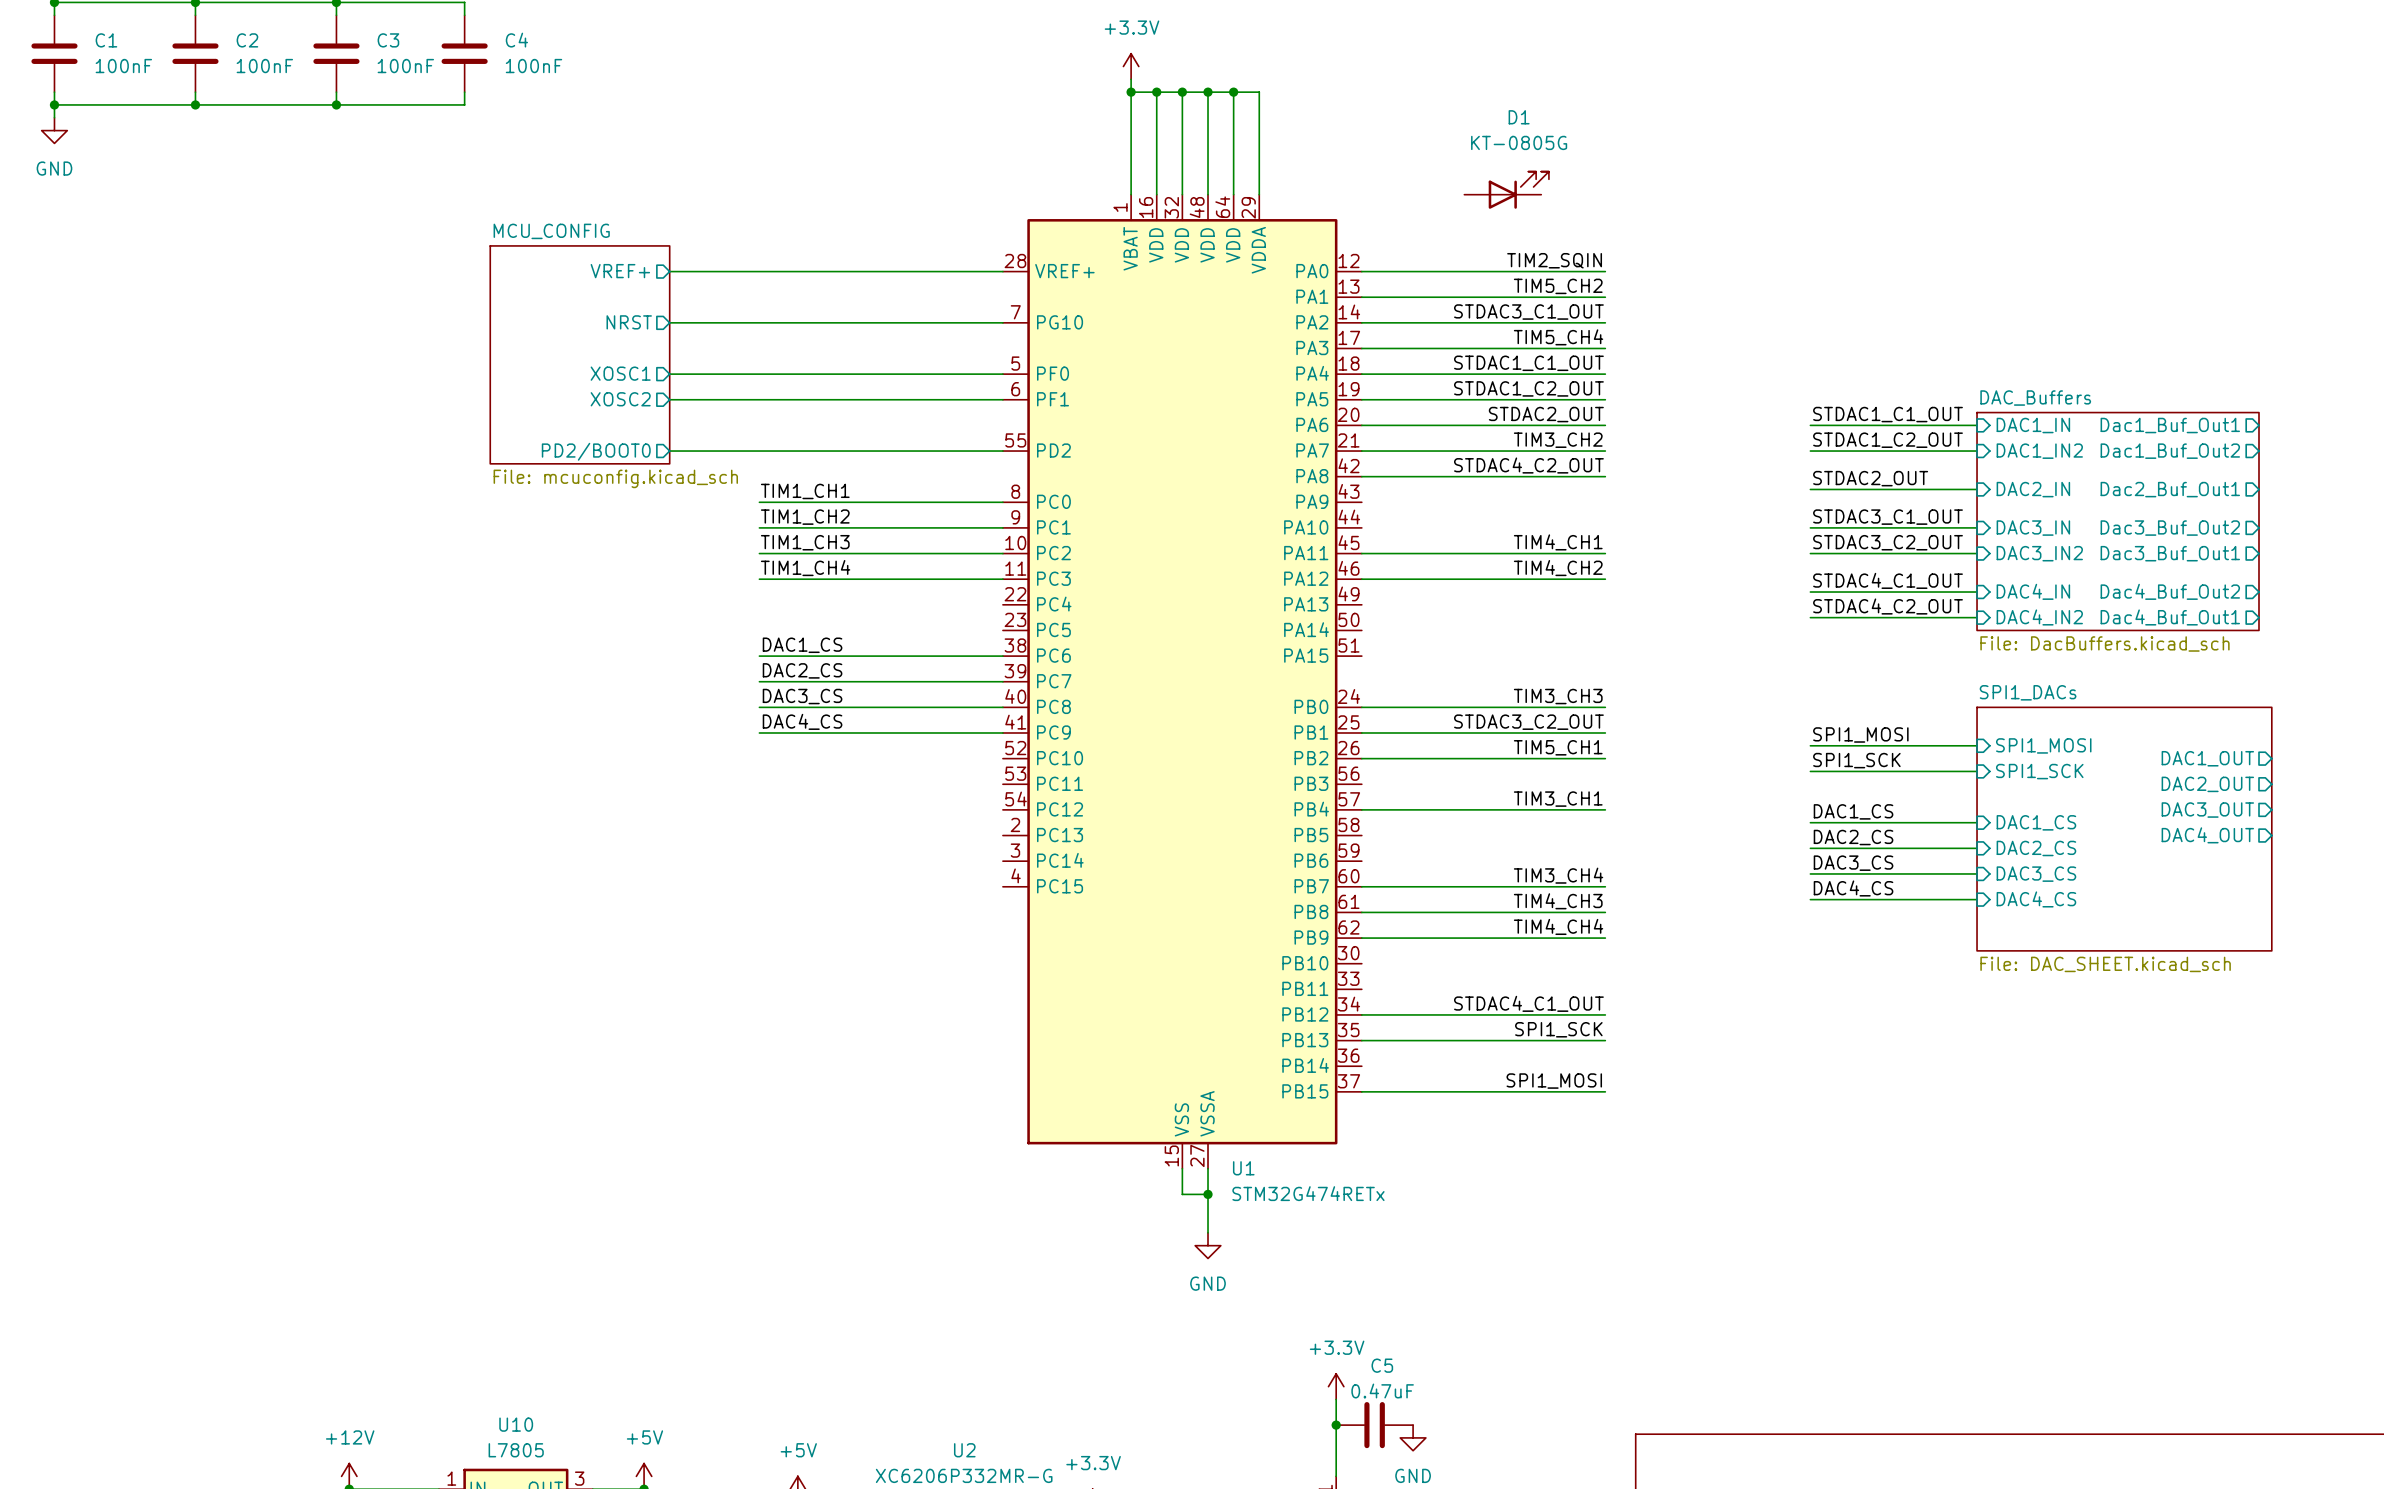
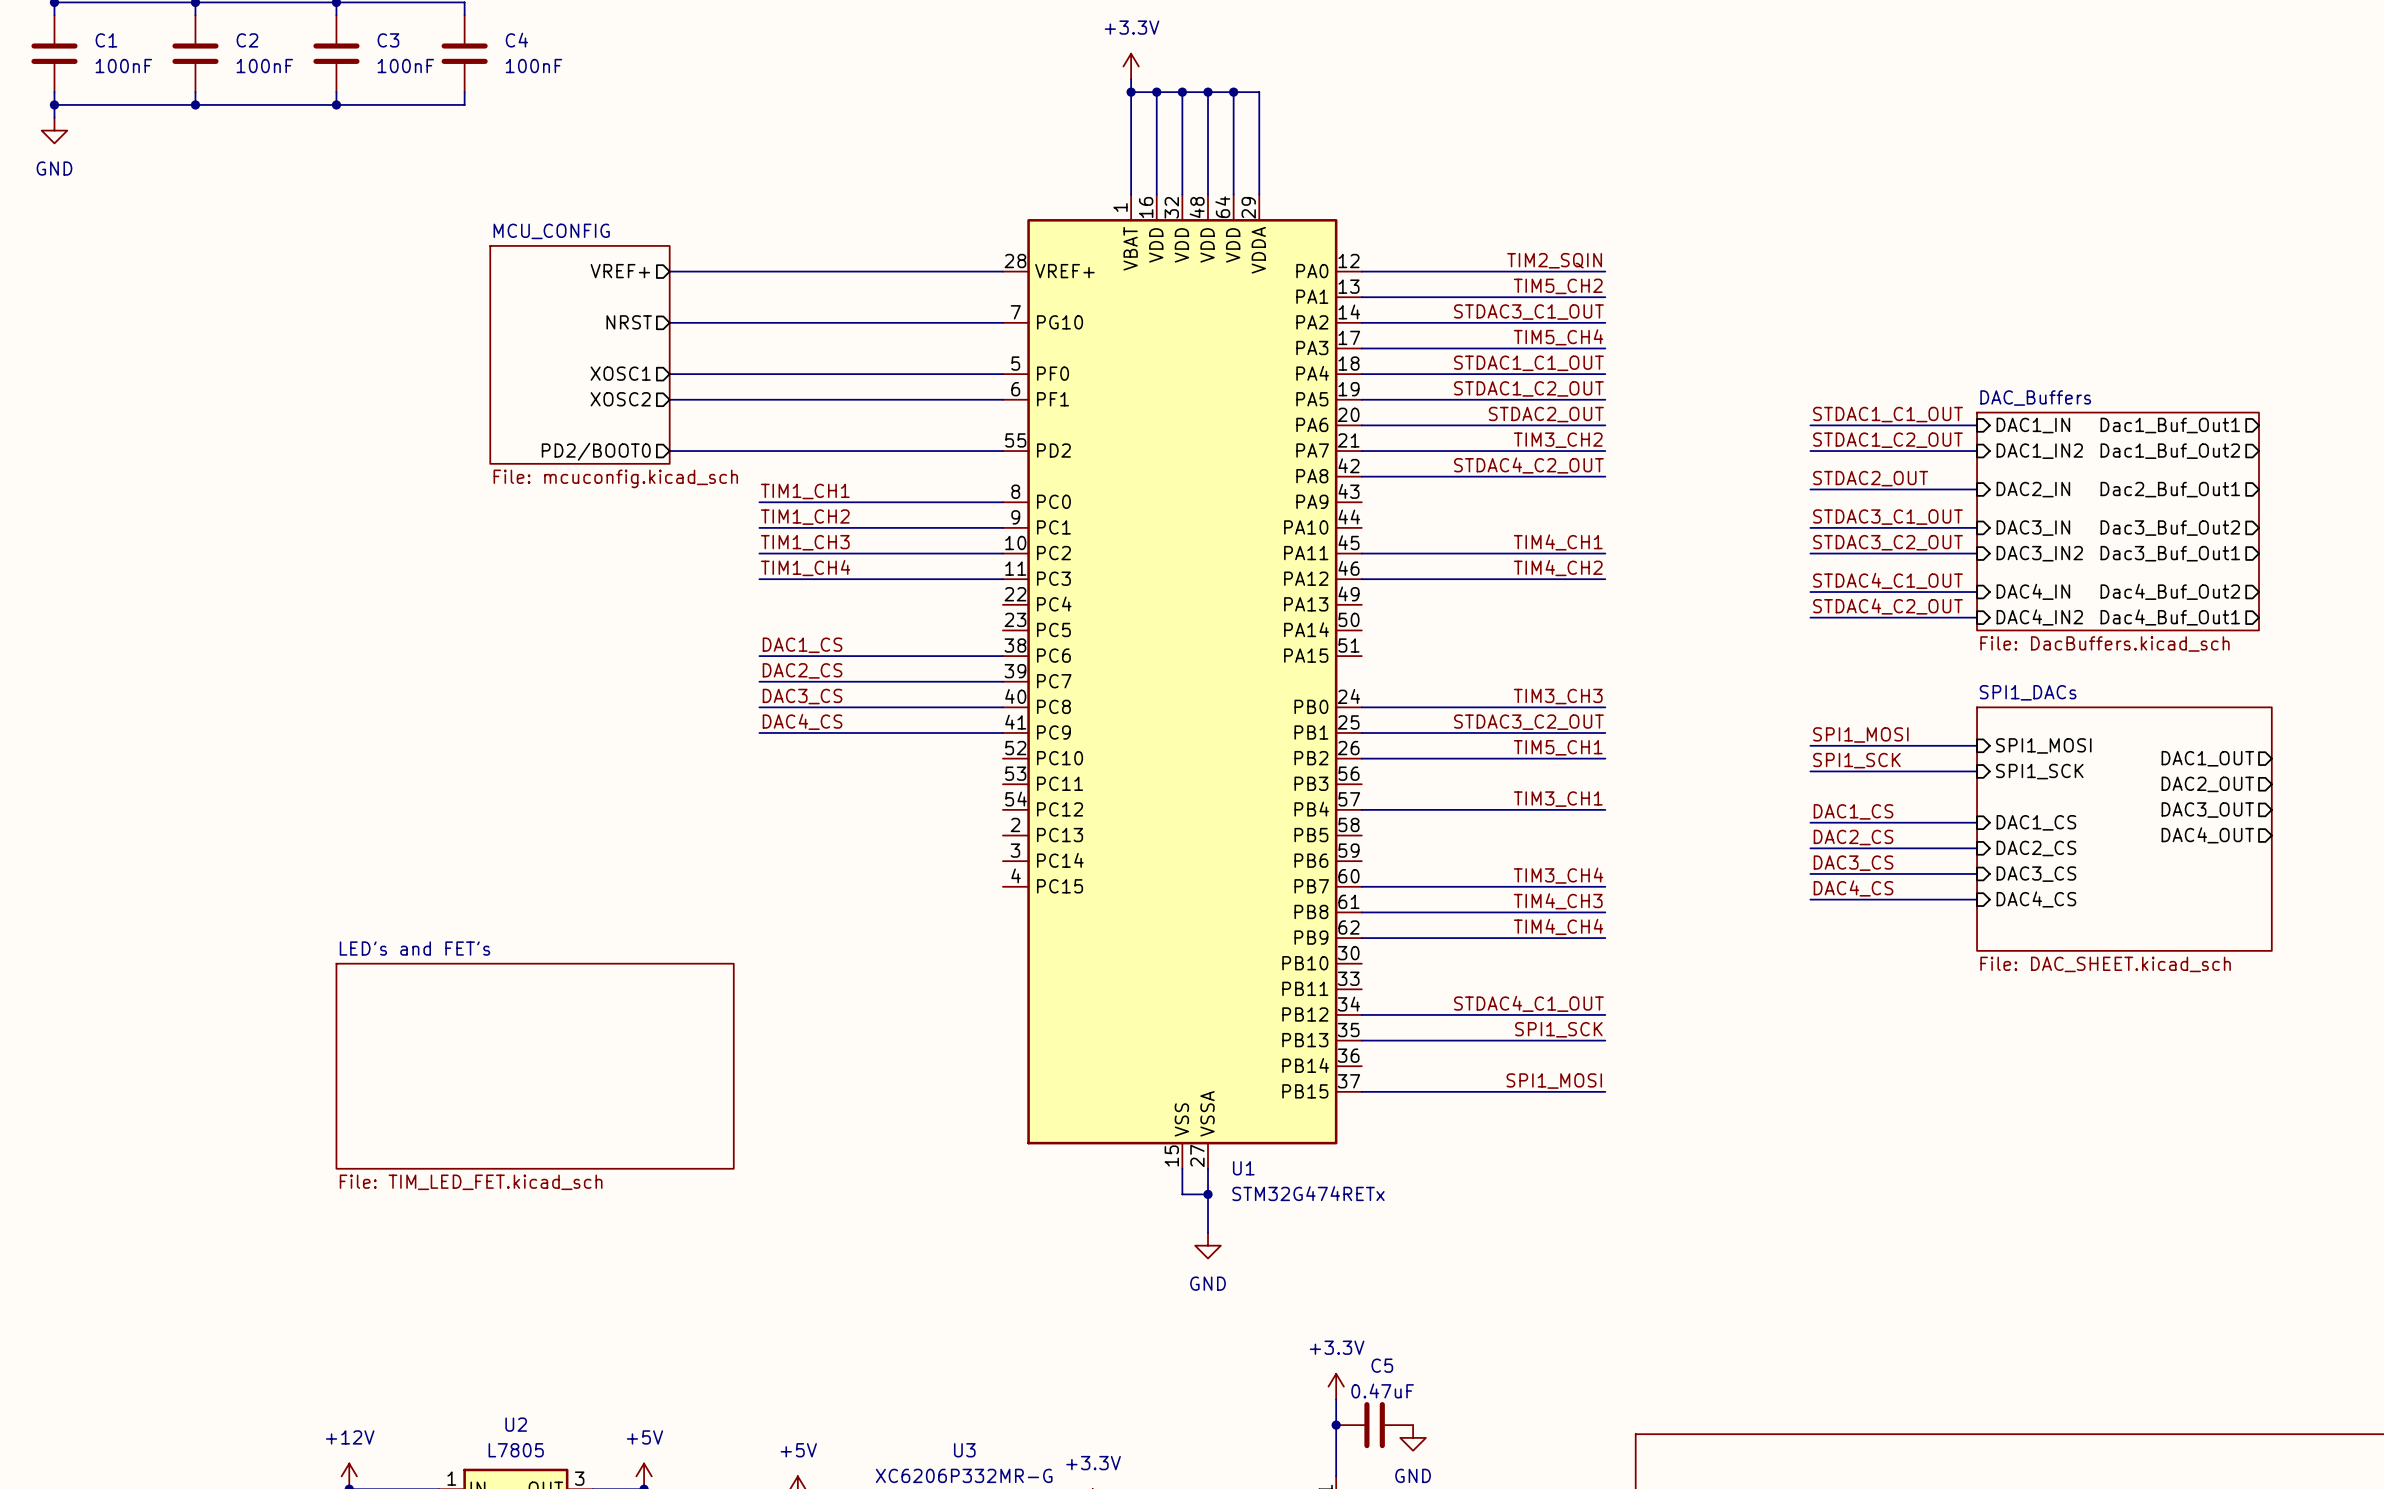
D1: KT-0805G (1506, 190) -> none
sheet LED's and FET's: none -> File: TIM_LED_FET.kicad_sch (535, 1066)
U10 name: U10 (516, 1424) -> U2 (516, 1424)
U2 name: U2 (964, 1450) -> U3 (964, 1450)

